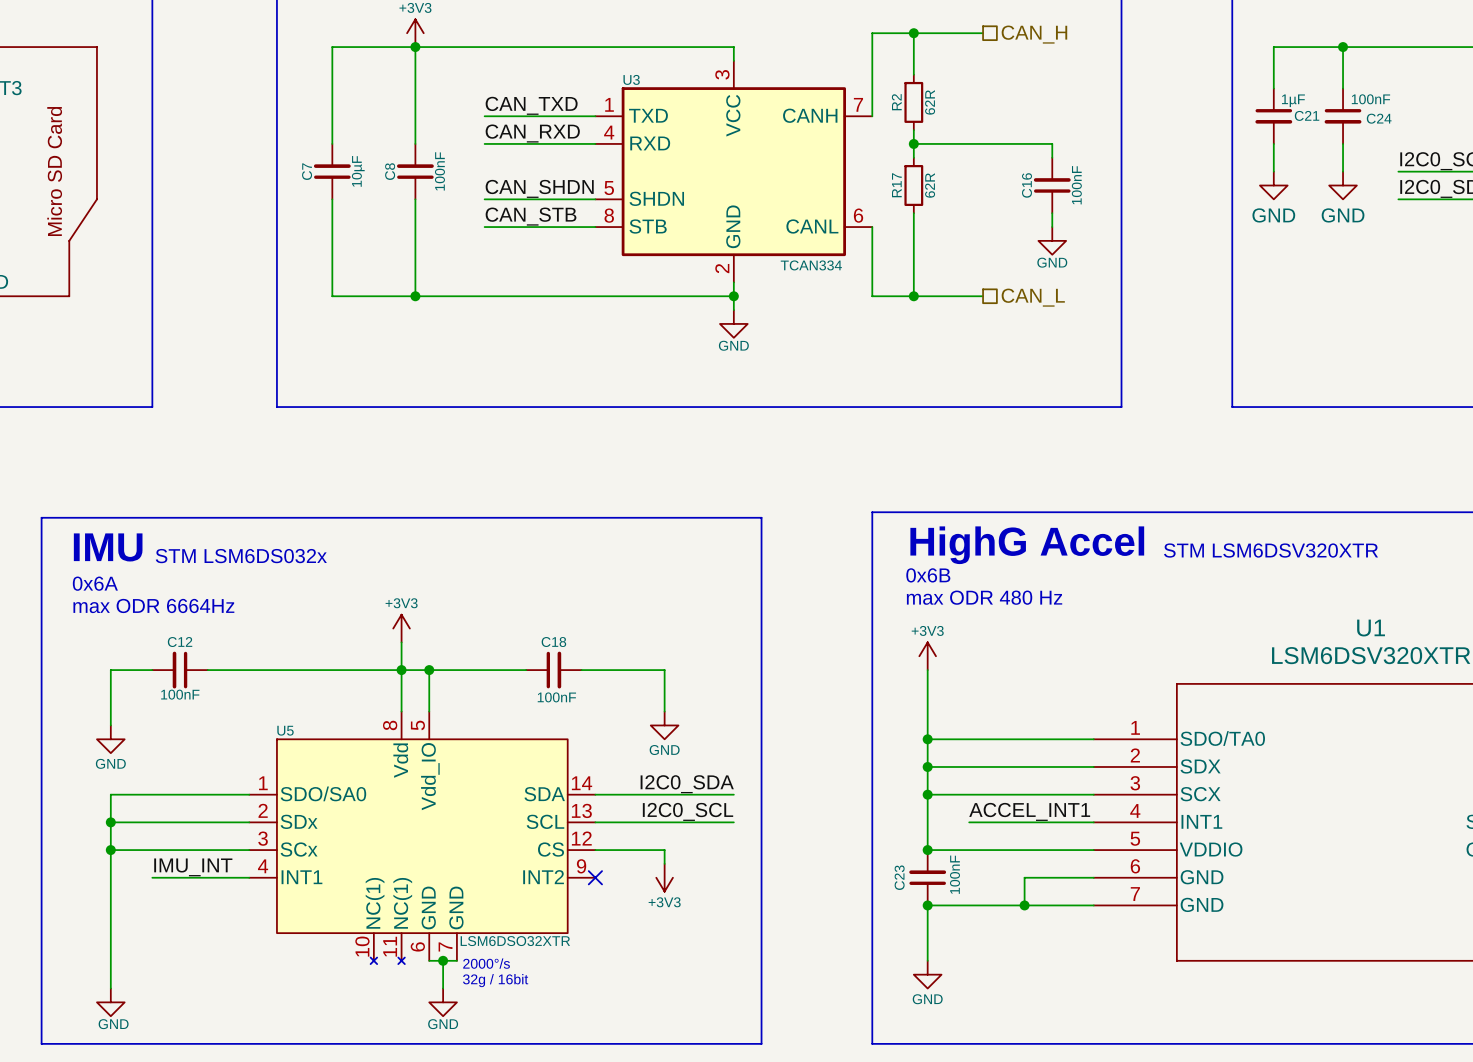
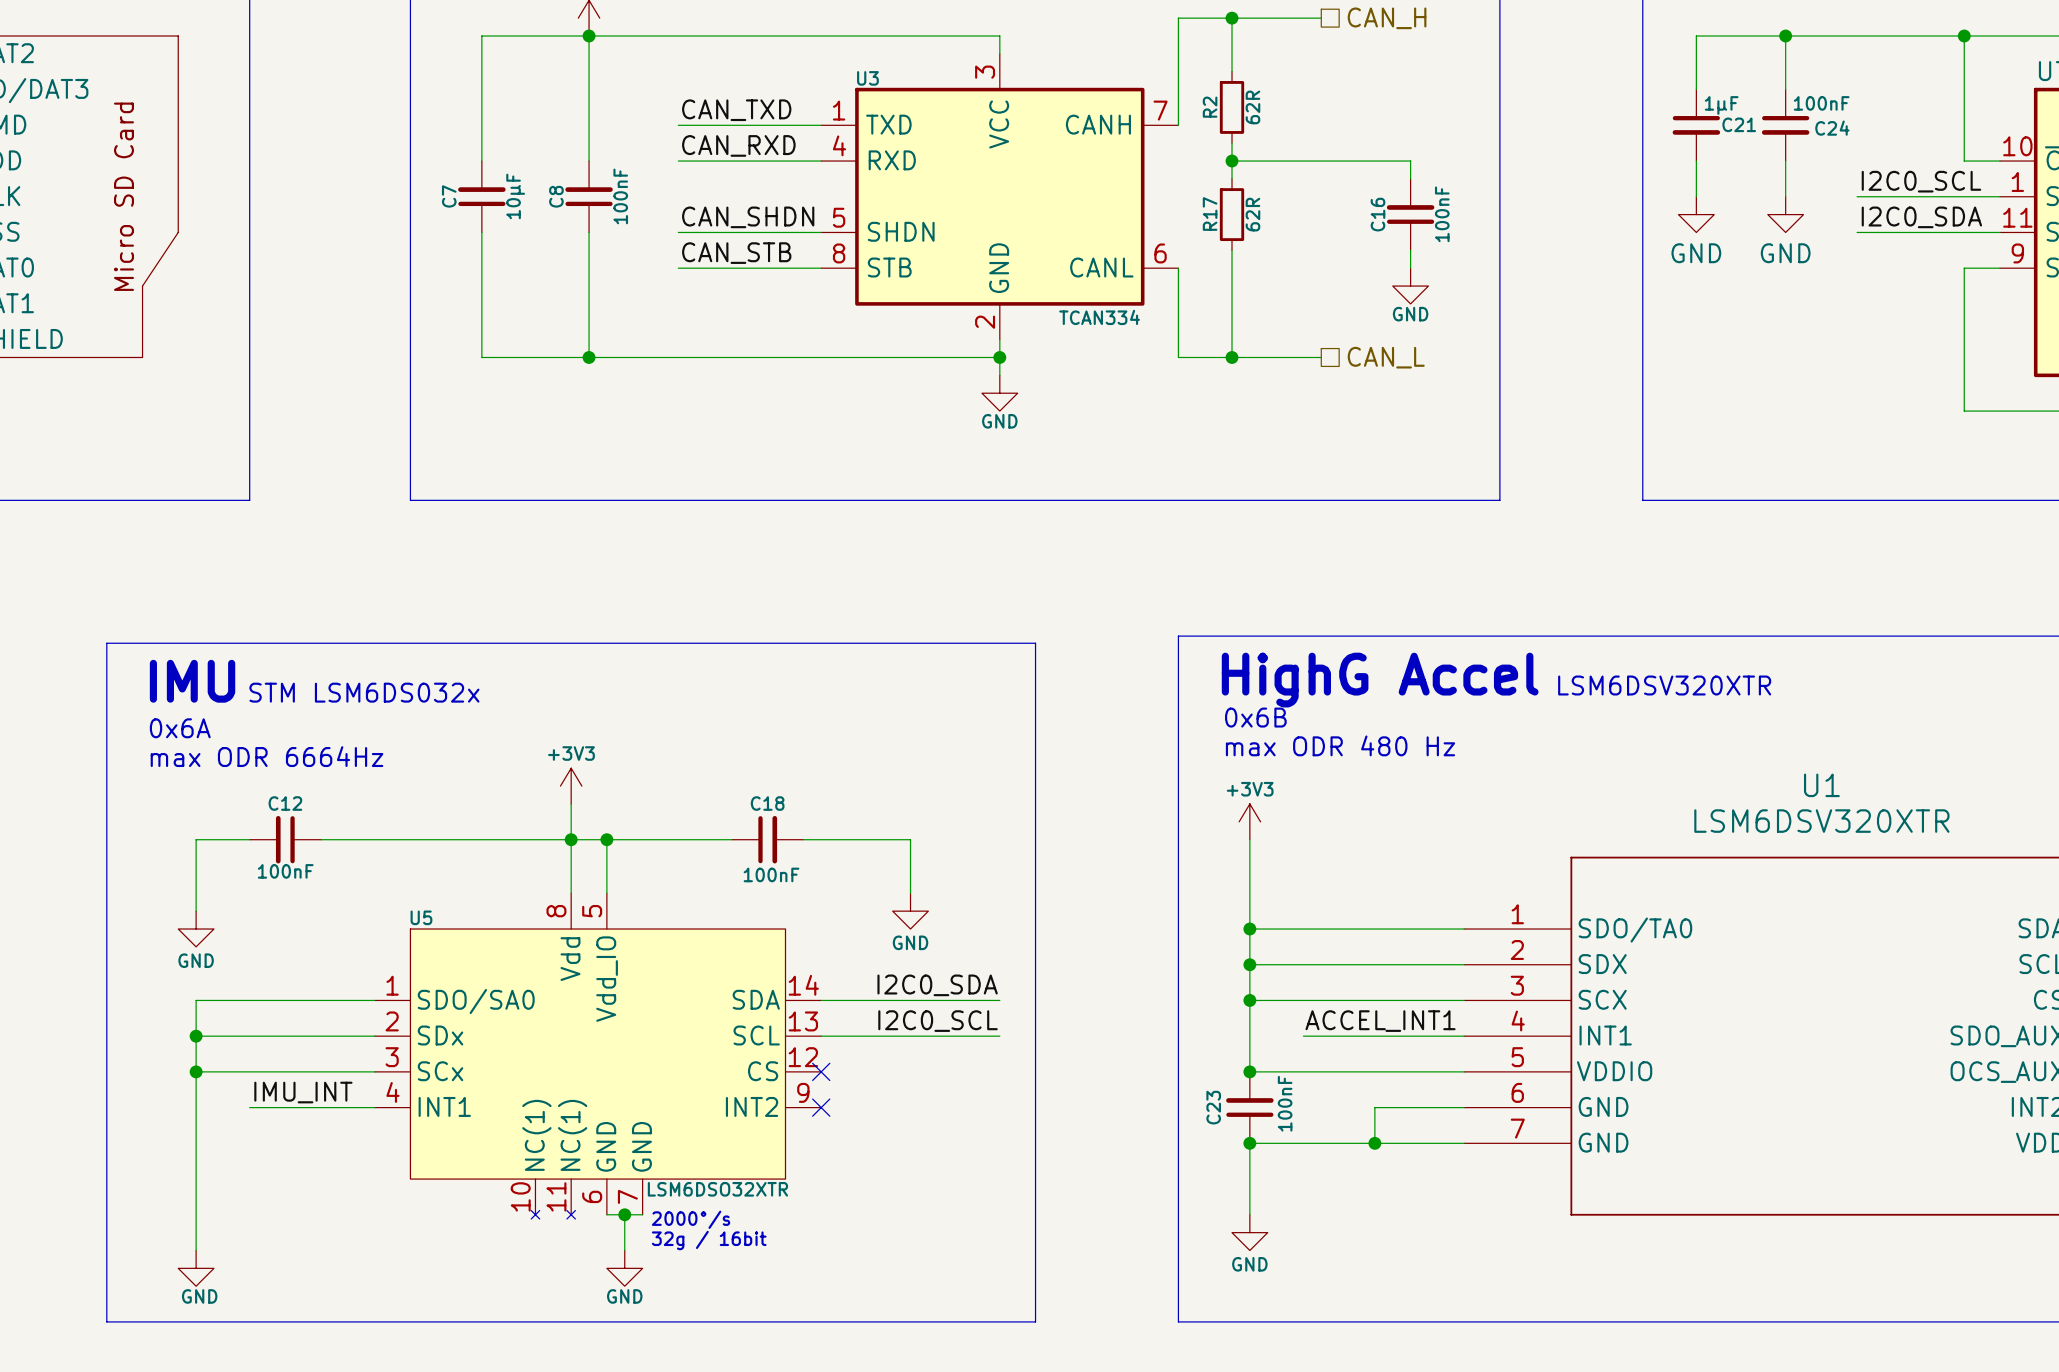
text: STM LSM6DSV320XTR (1271, 550) -> LSM6DSV320XTR (1664, 685)
wire: (595, 850) (664, 850) (664, 863) -> none
no-connect mark: none -> (821, 1071)
power symbol: +3V3 (664, 877) -> none

